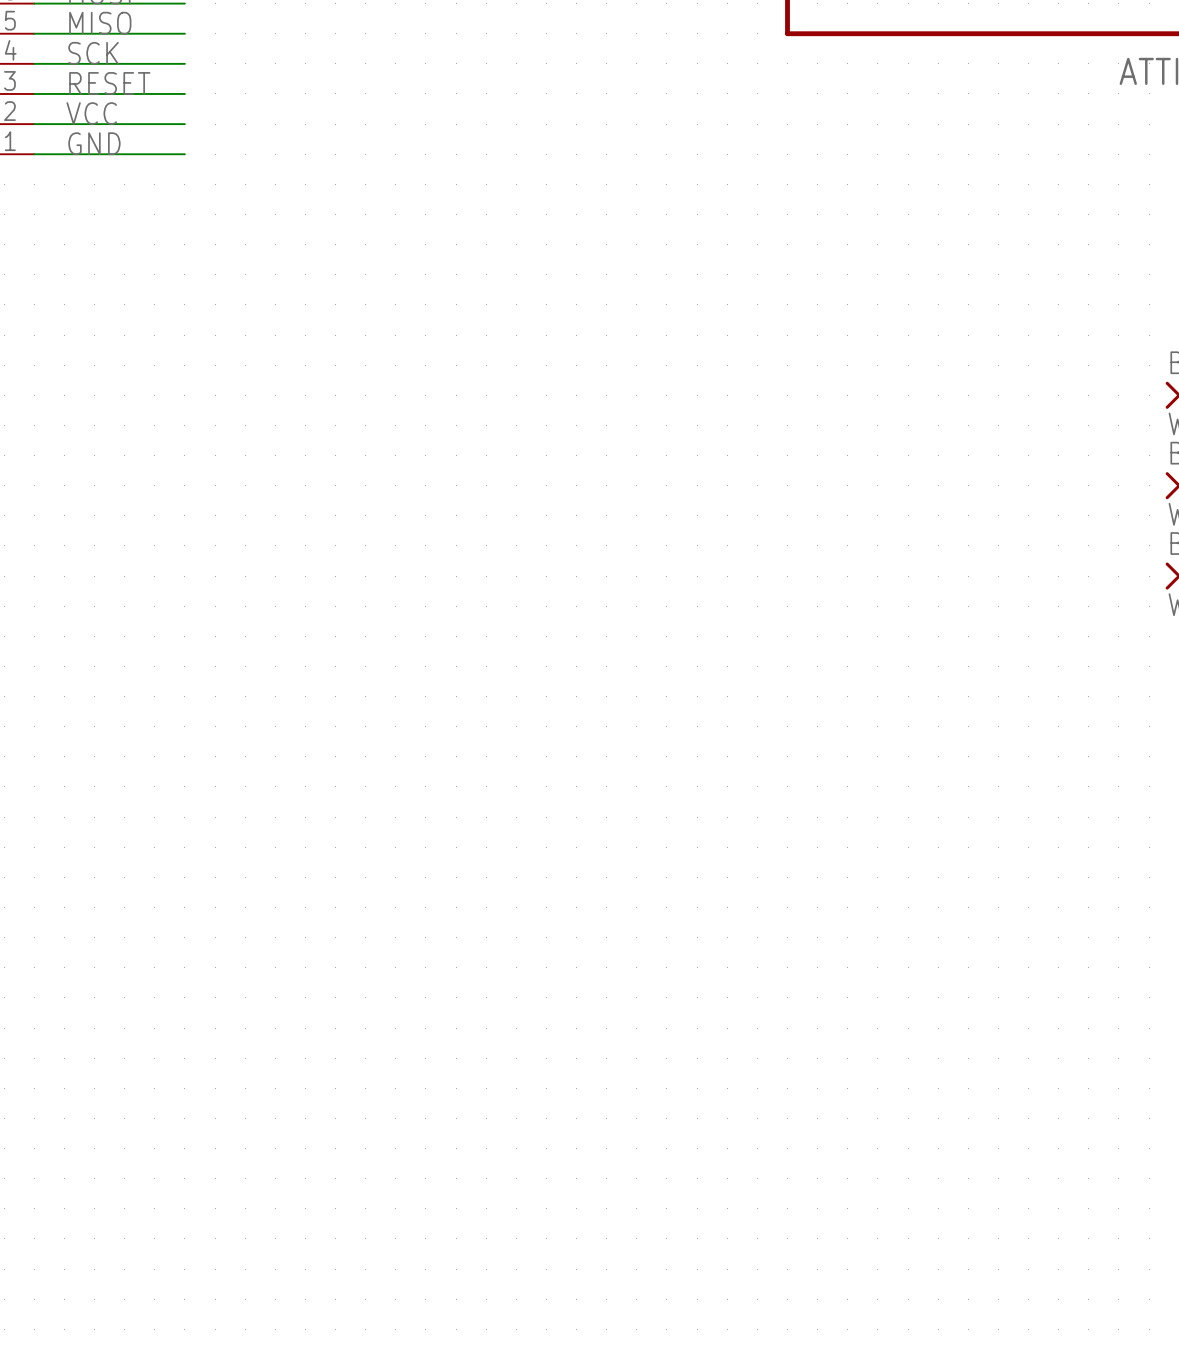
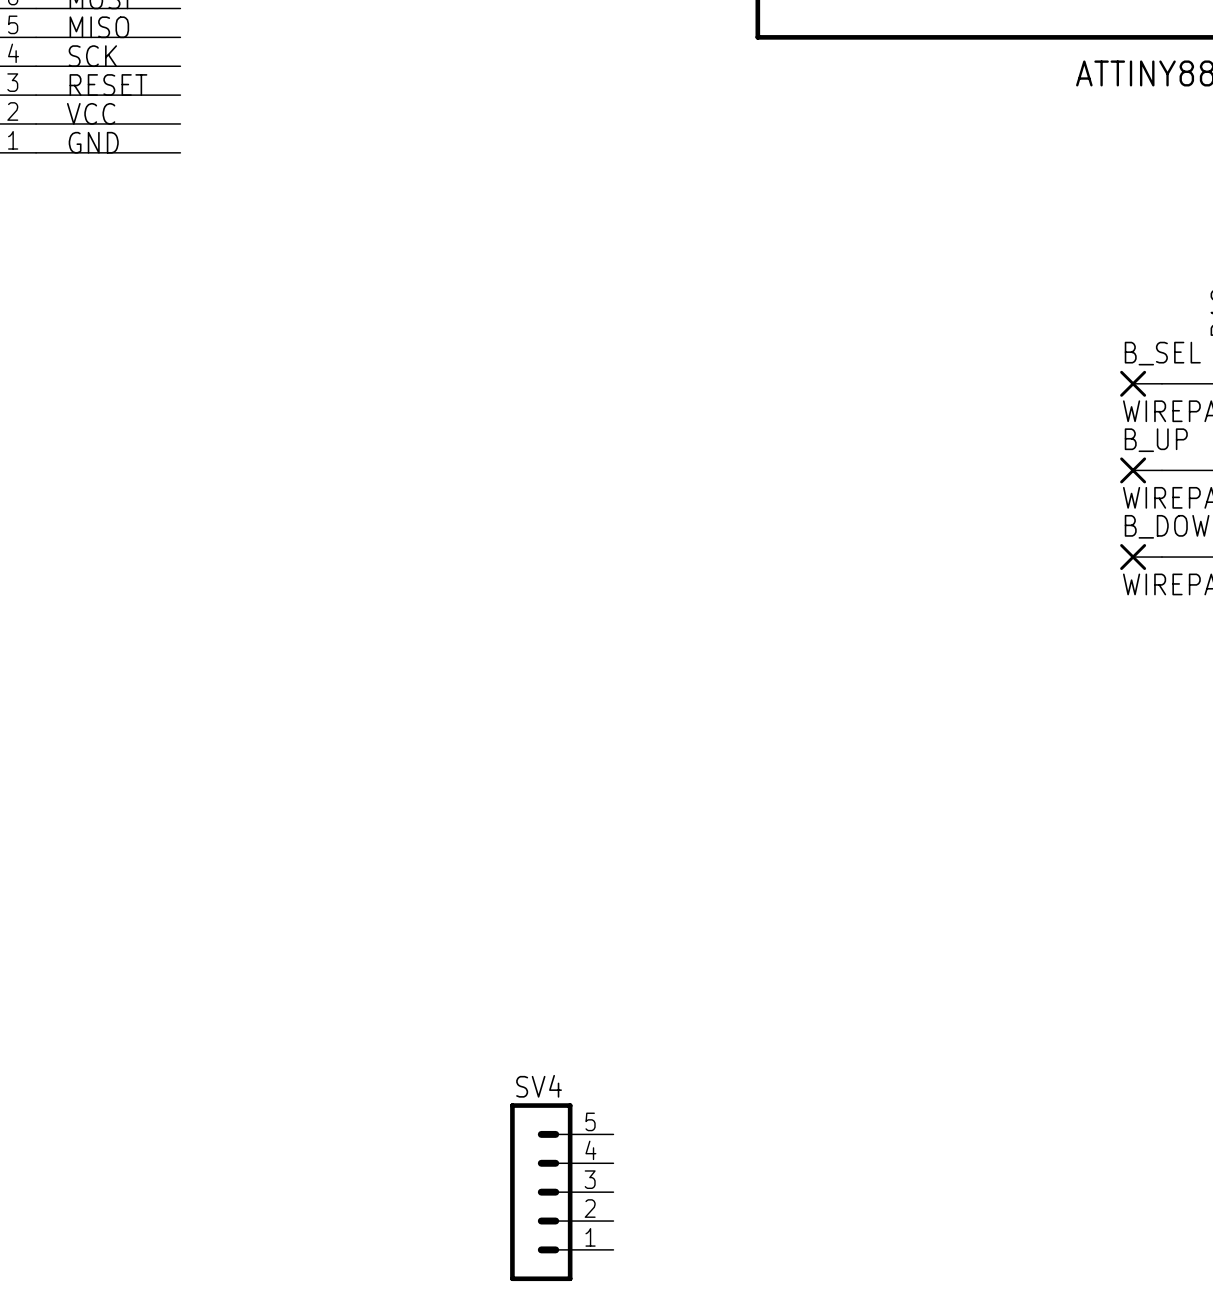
SV4: none -> (561, 1192)

